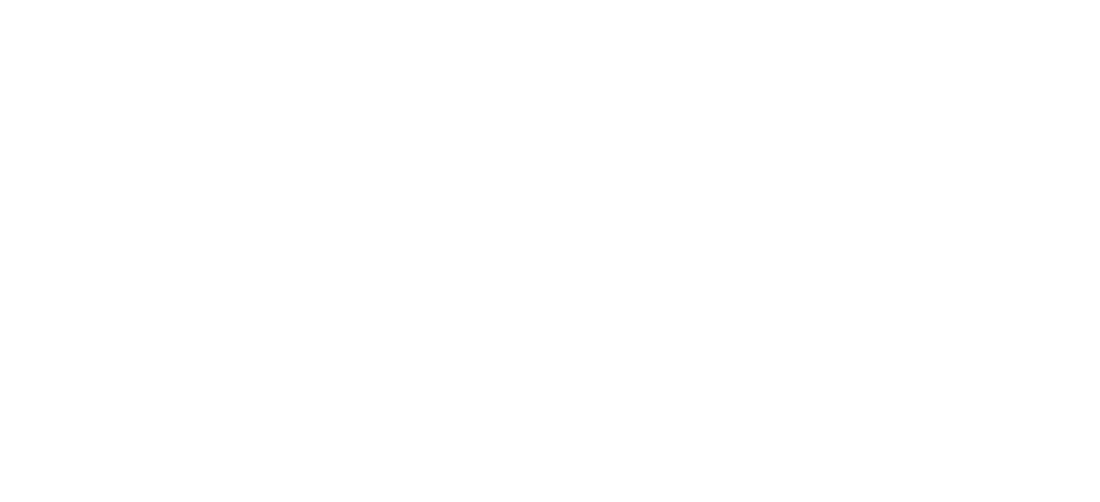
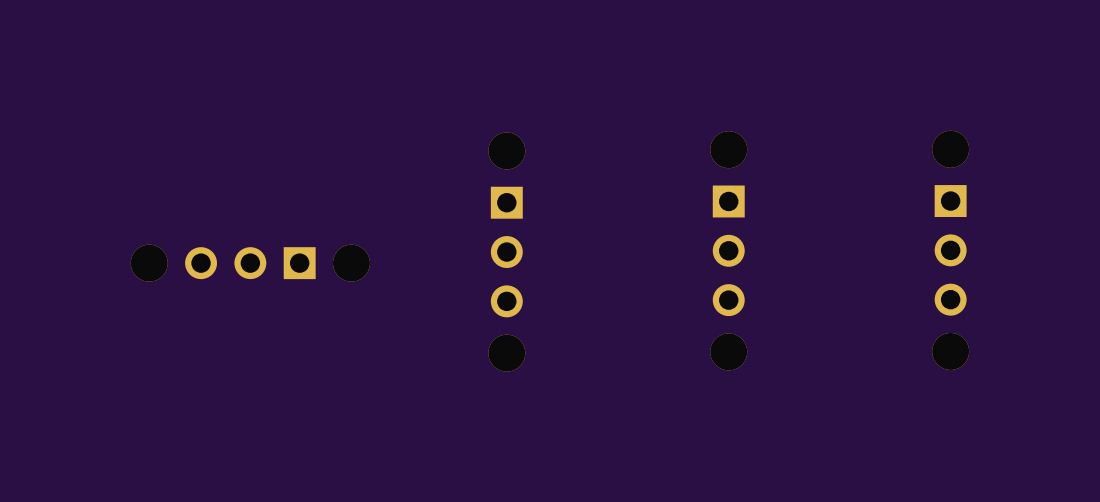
part: none -> (728, 250)
part: none -> (950, 250)
part: none -> (506, 252)
part: none -> (250, 263)

